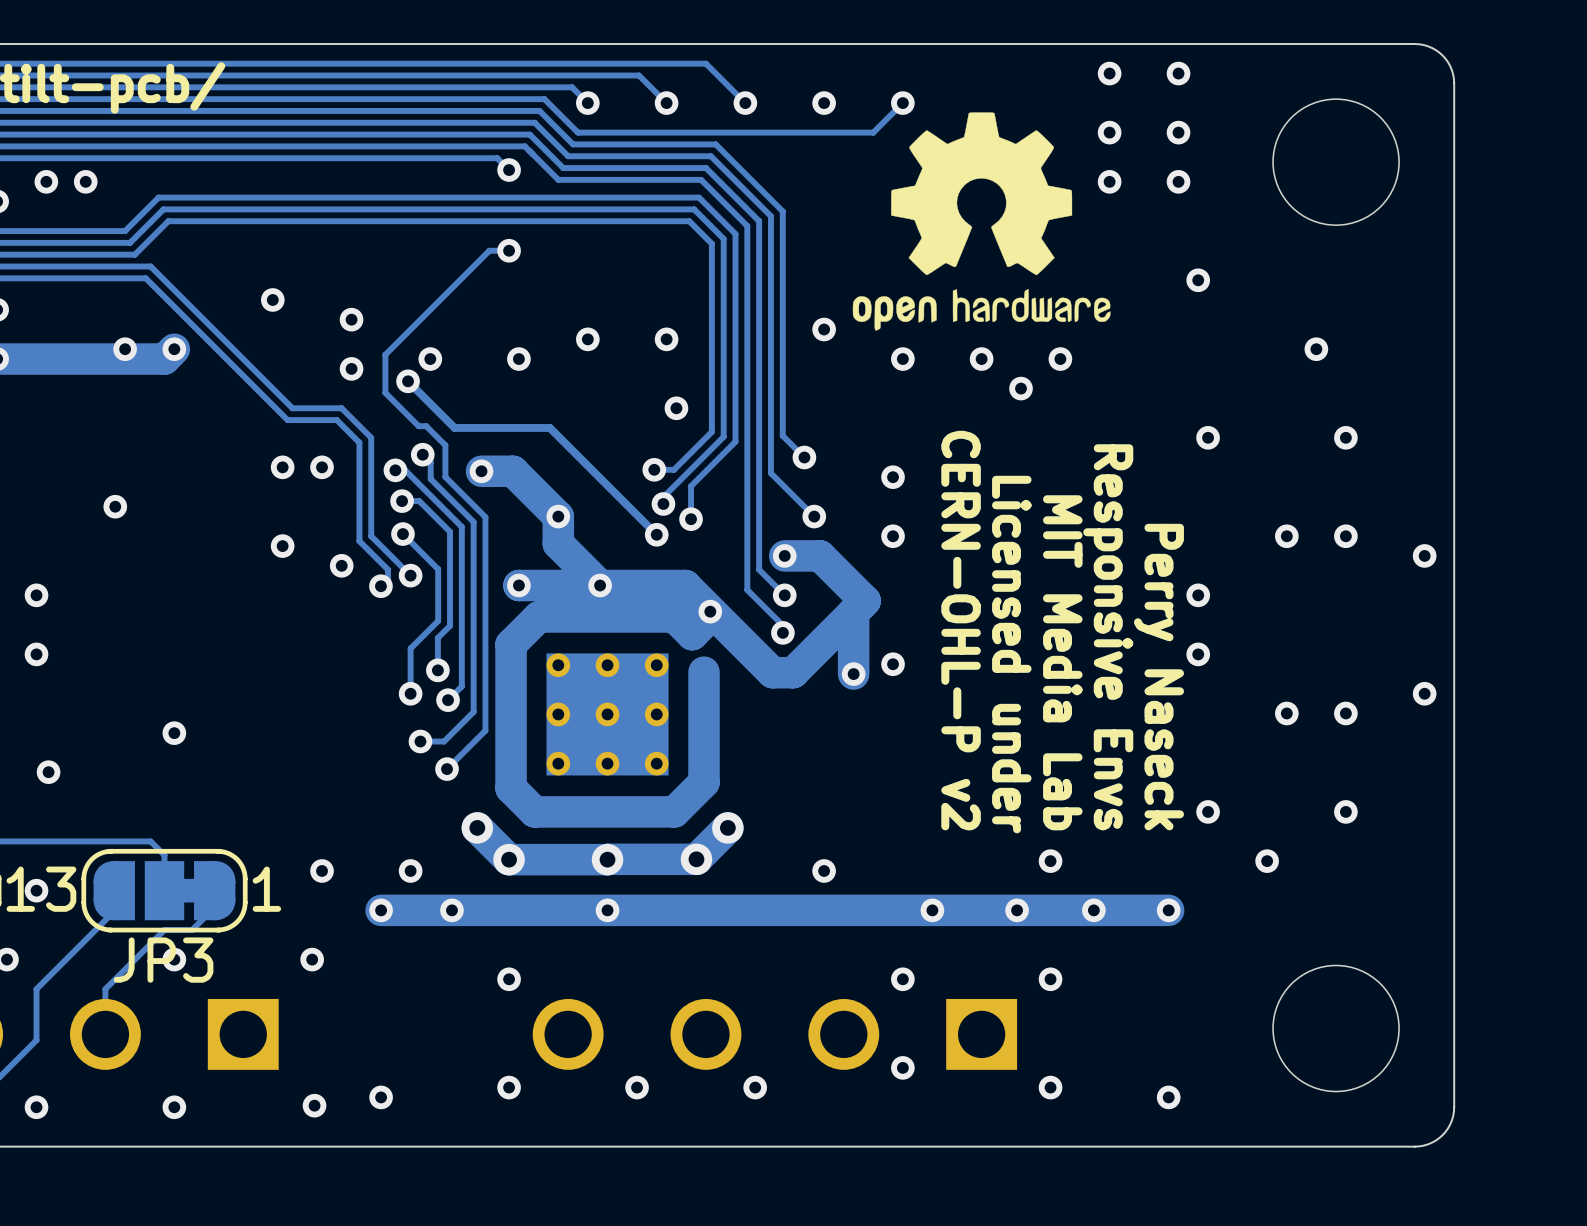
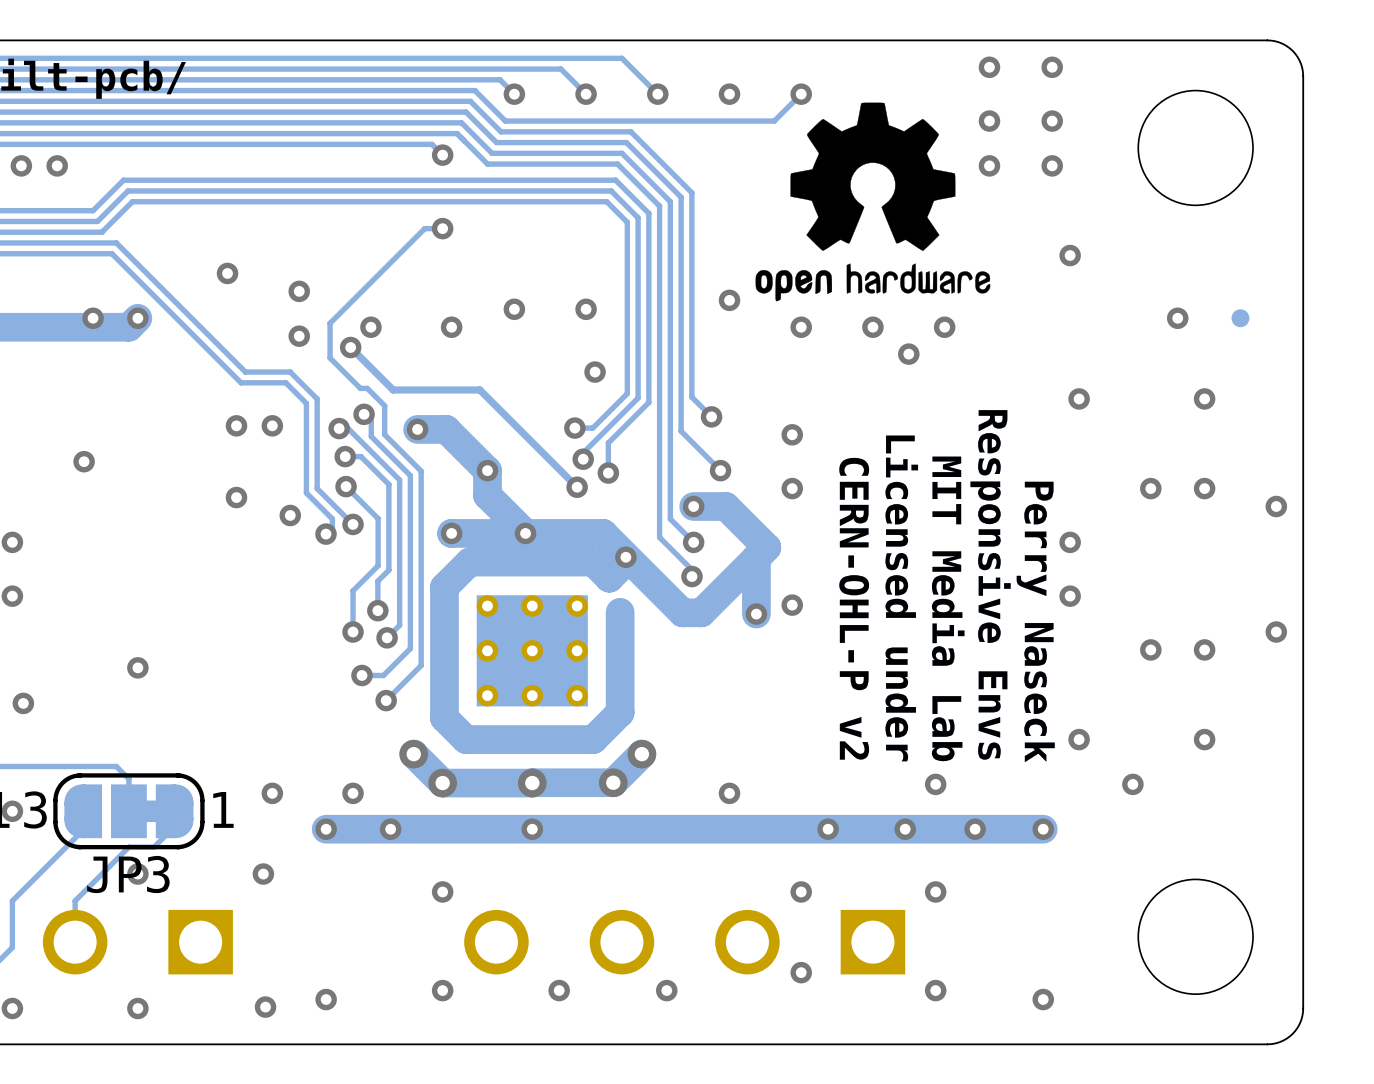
part: none -> (1240, 318)

